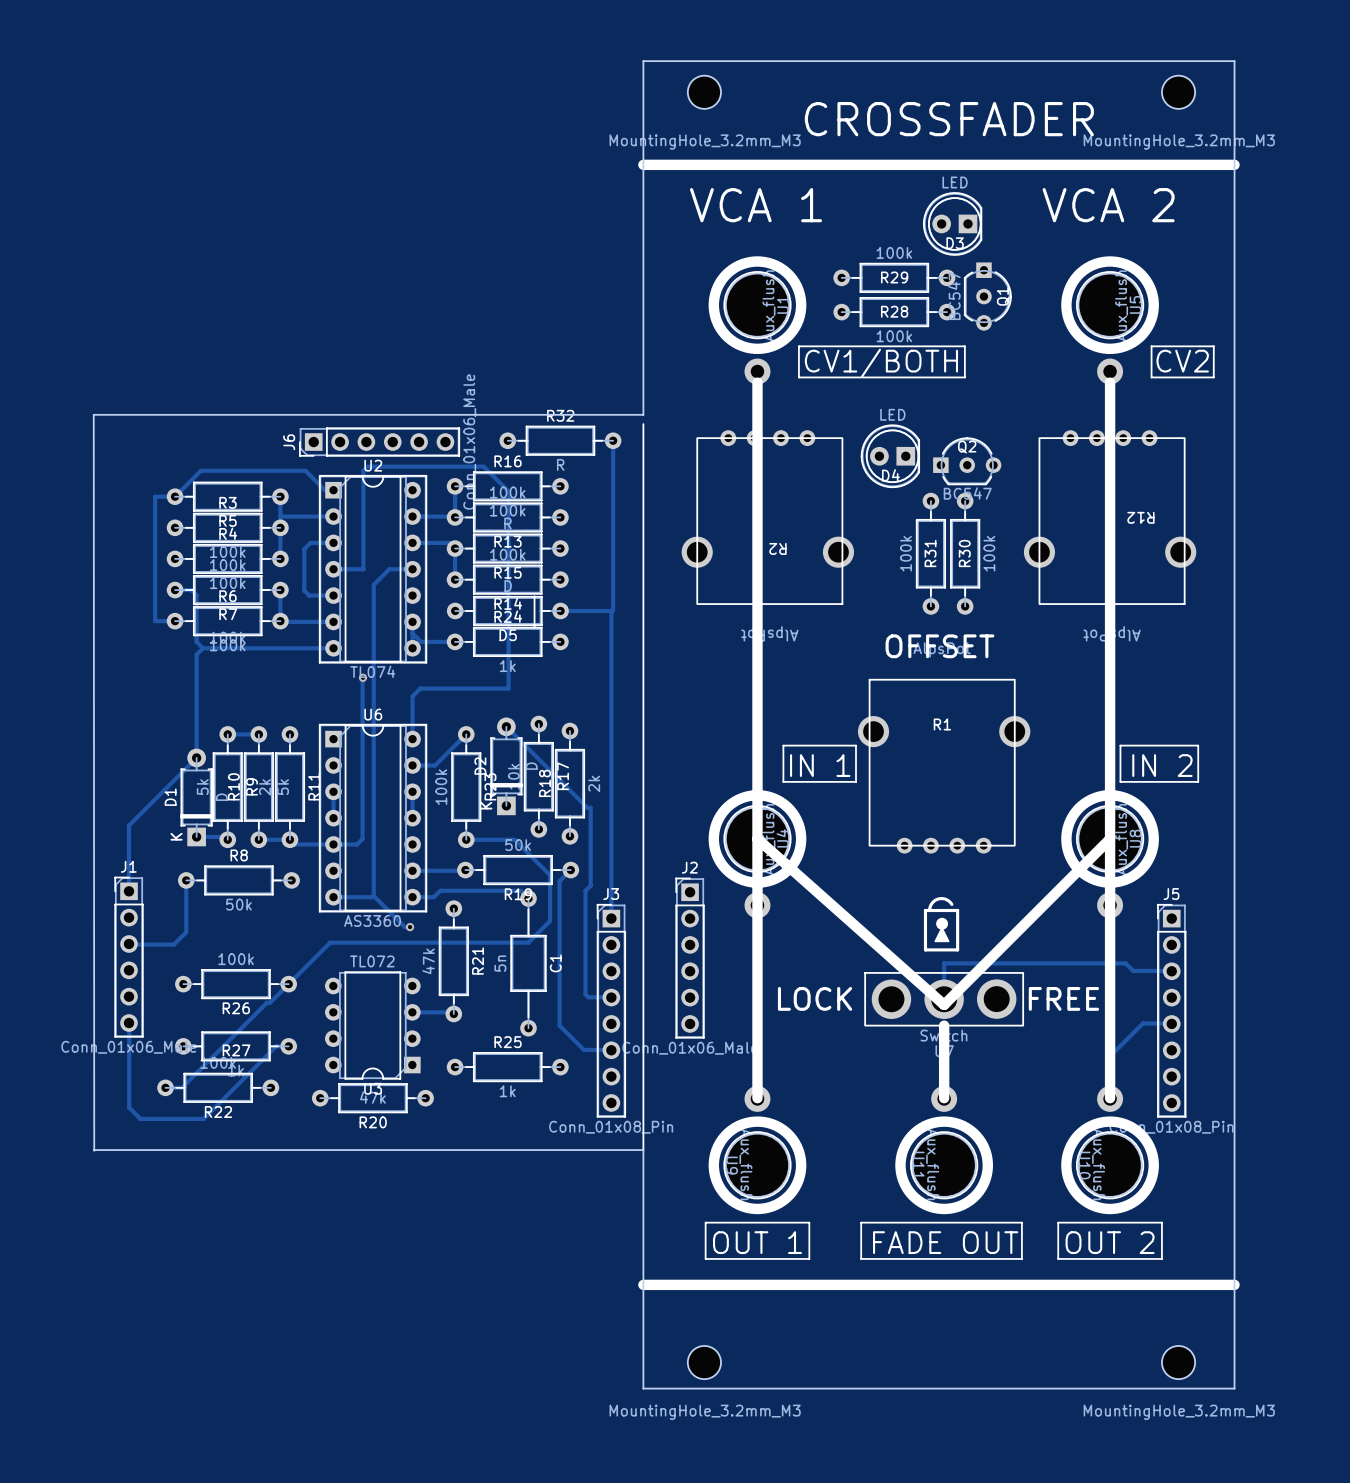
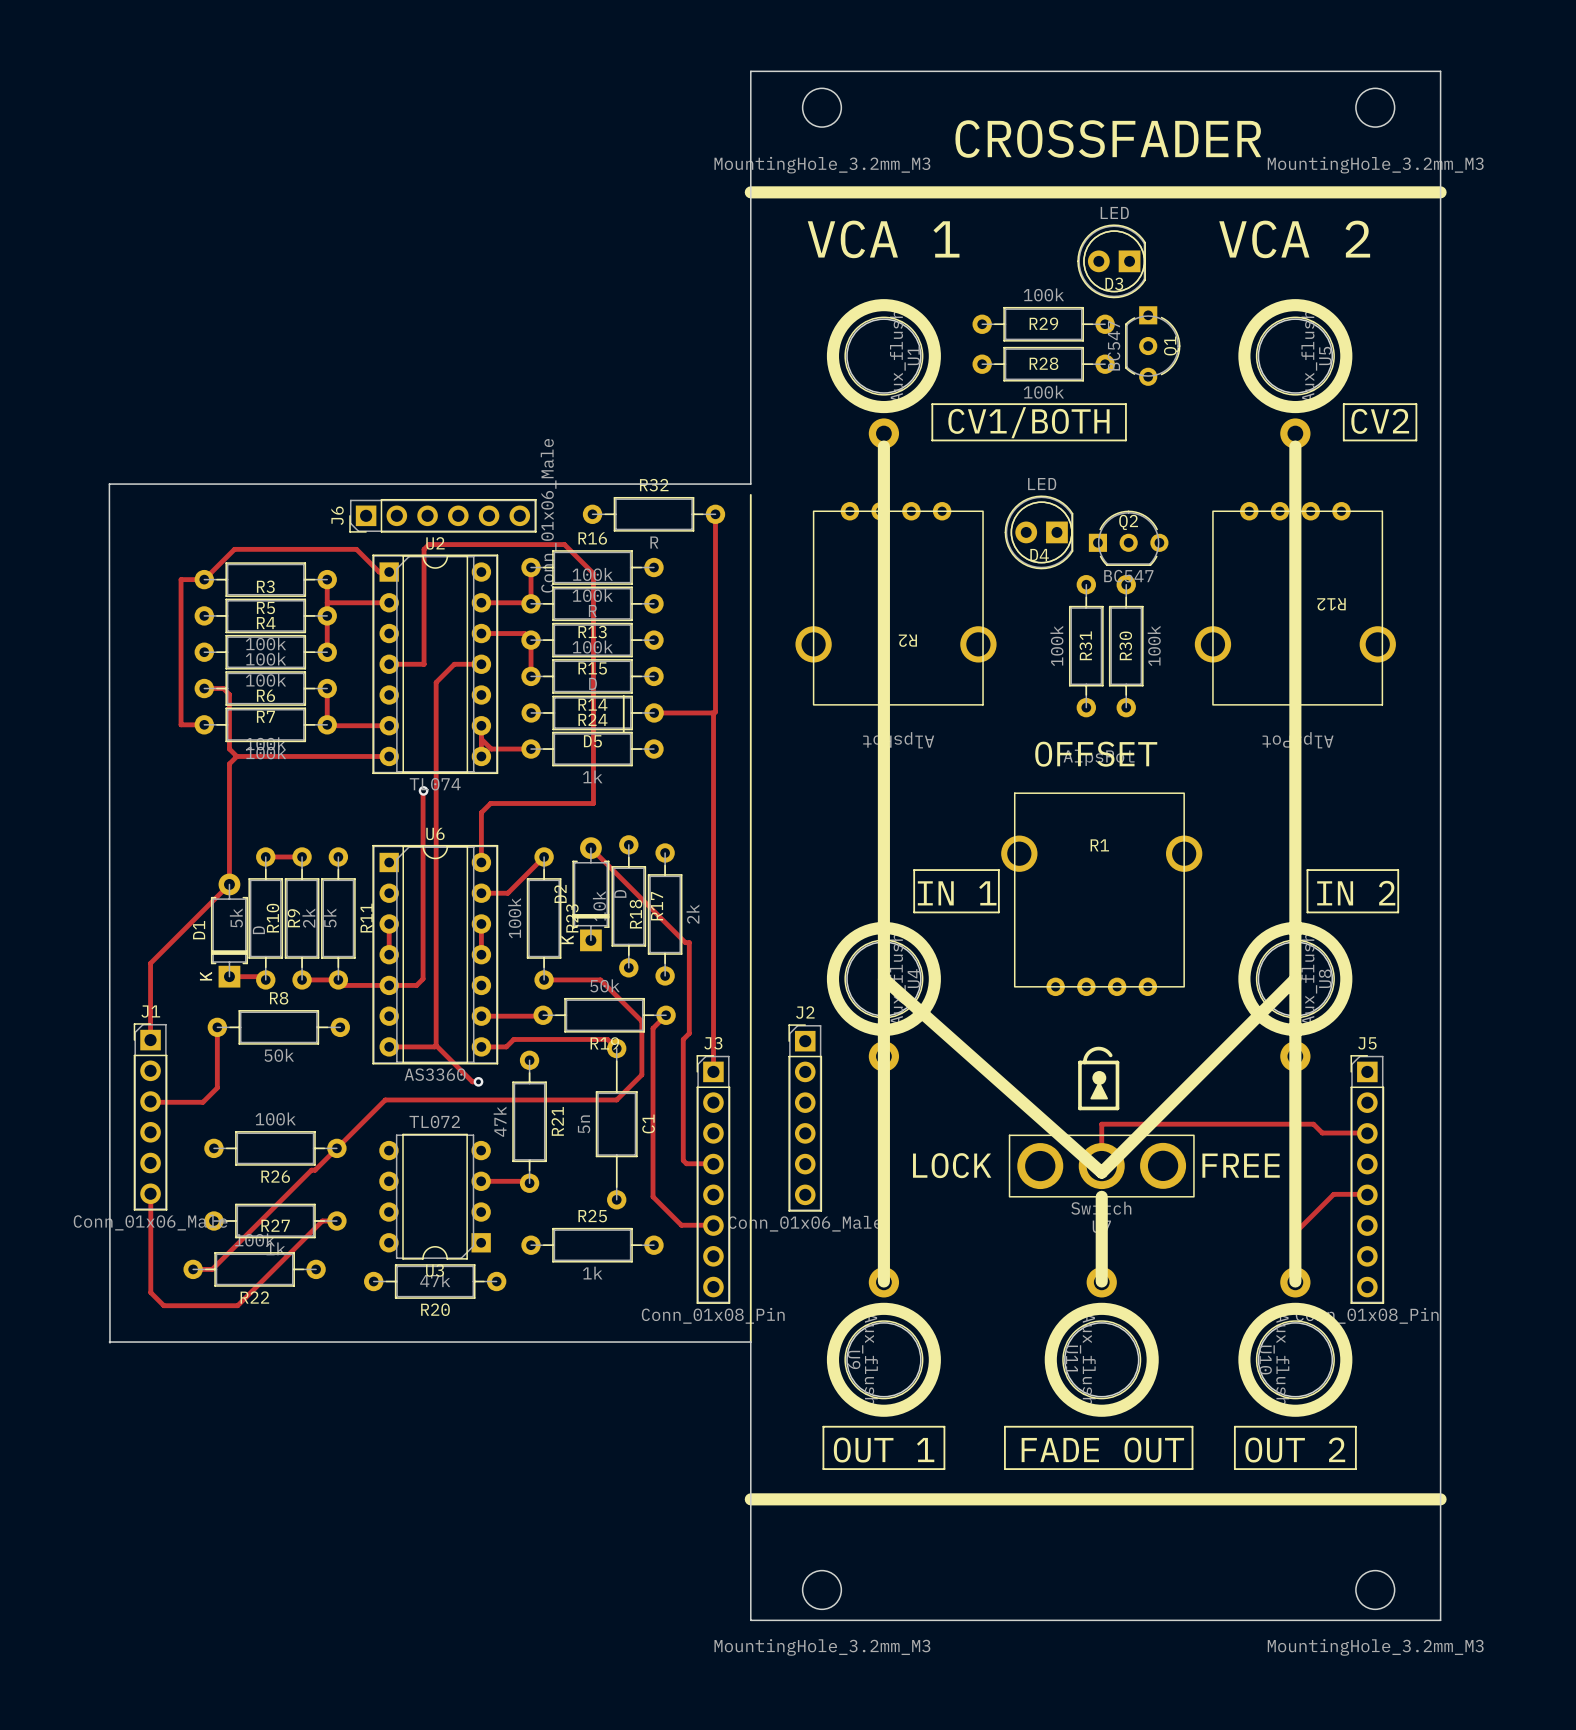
track: (333, 542) (310, 542) (304, 549) (304, 590) (309, 595) (333, 595) -> none

